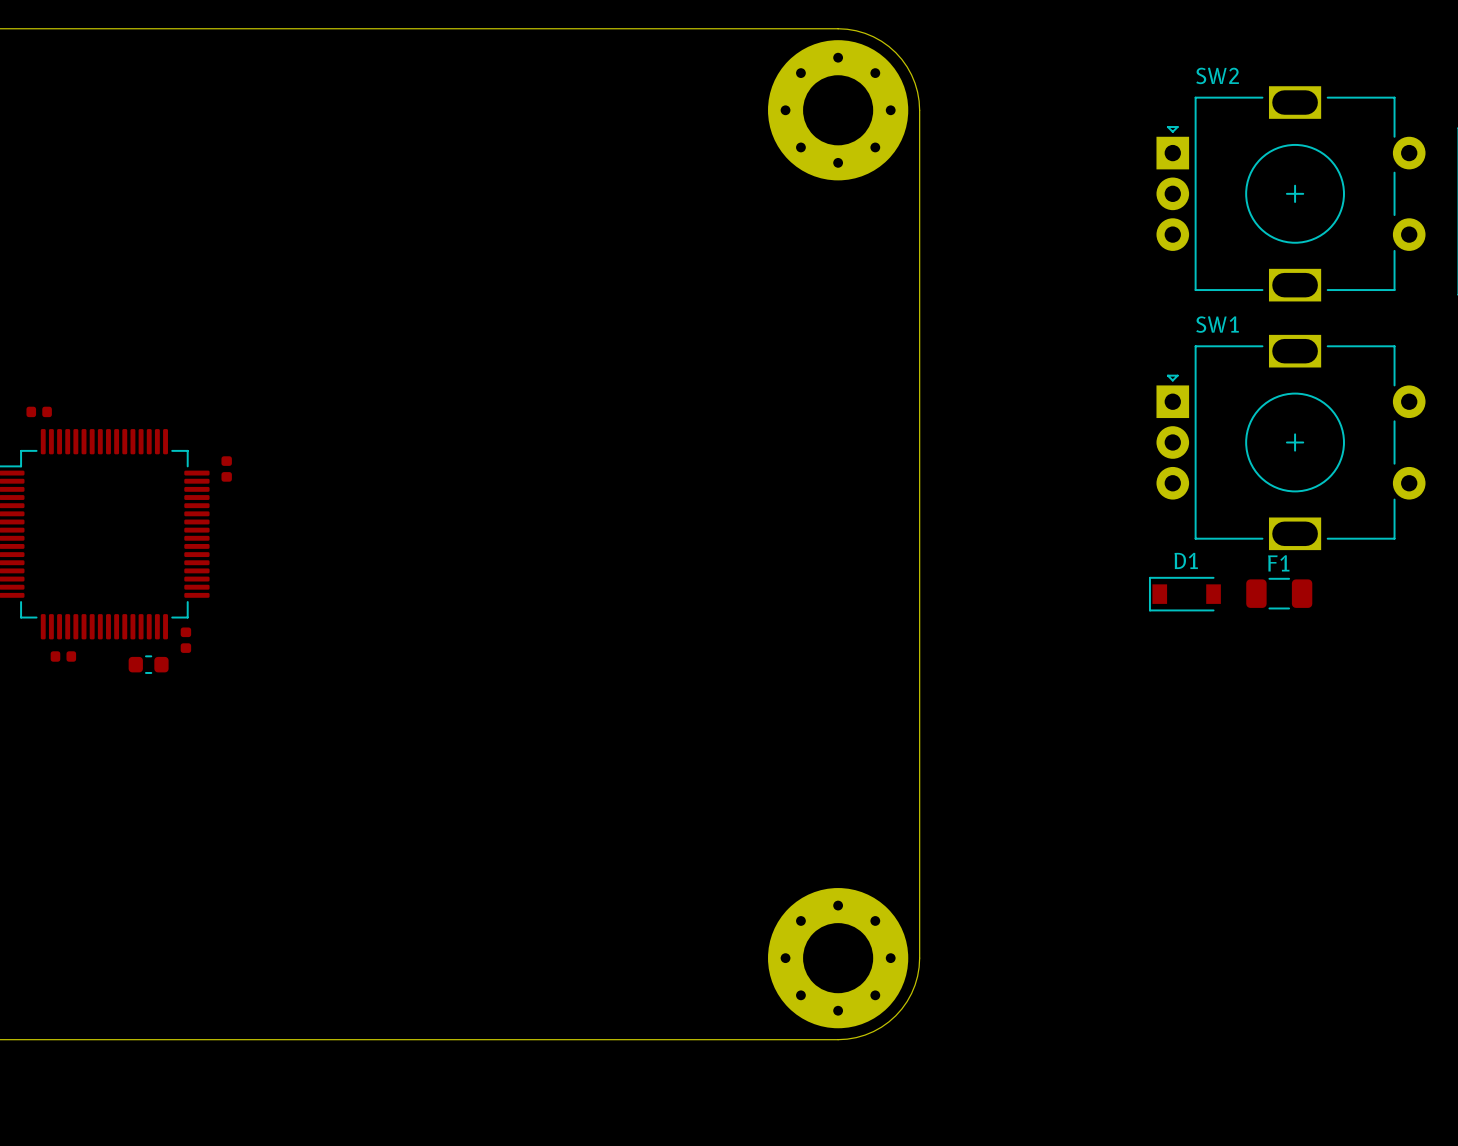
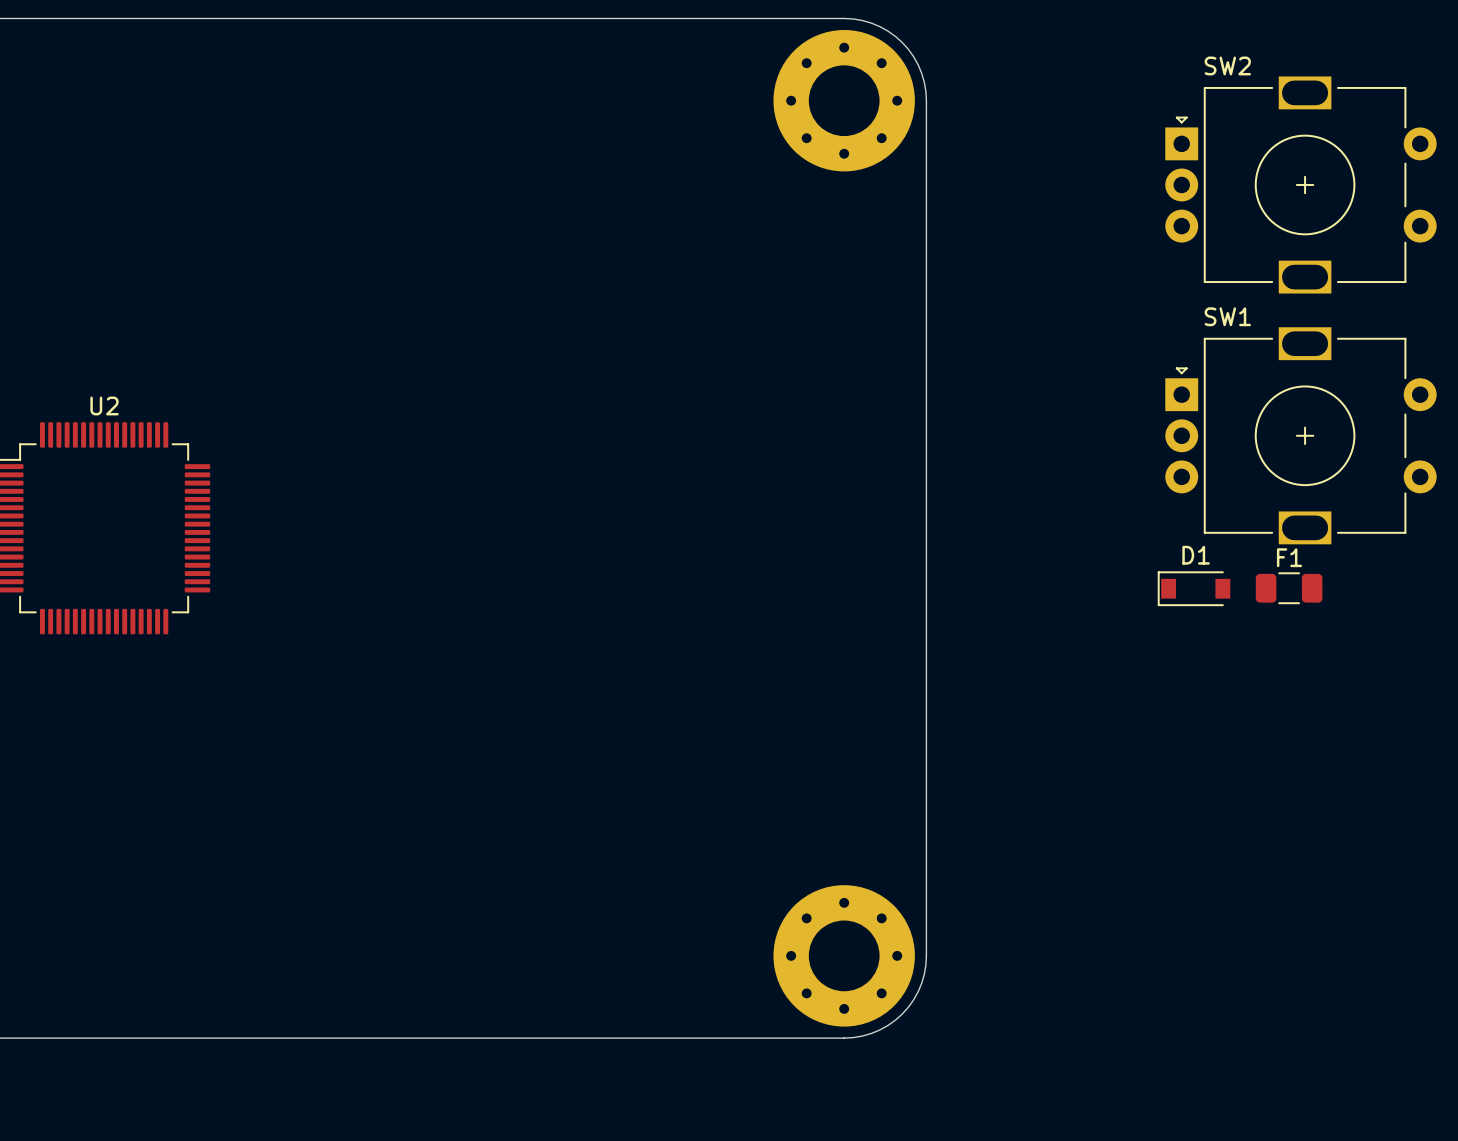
part: (39, 411) -> none
U2 name: none -> U2 (104, 405)
part: (226, 468) -> none
part: (185, 640) -> none
part: (63, 656) -> none
part: (148, 664) -> none

